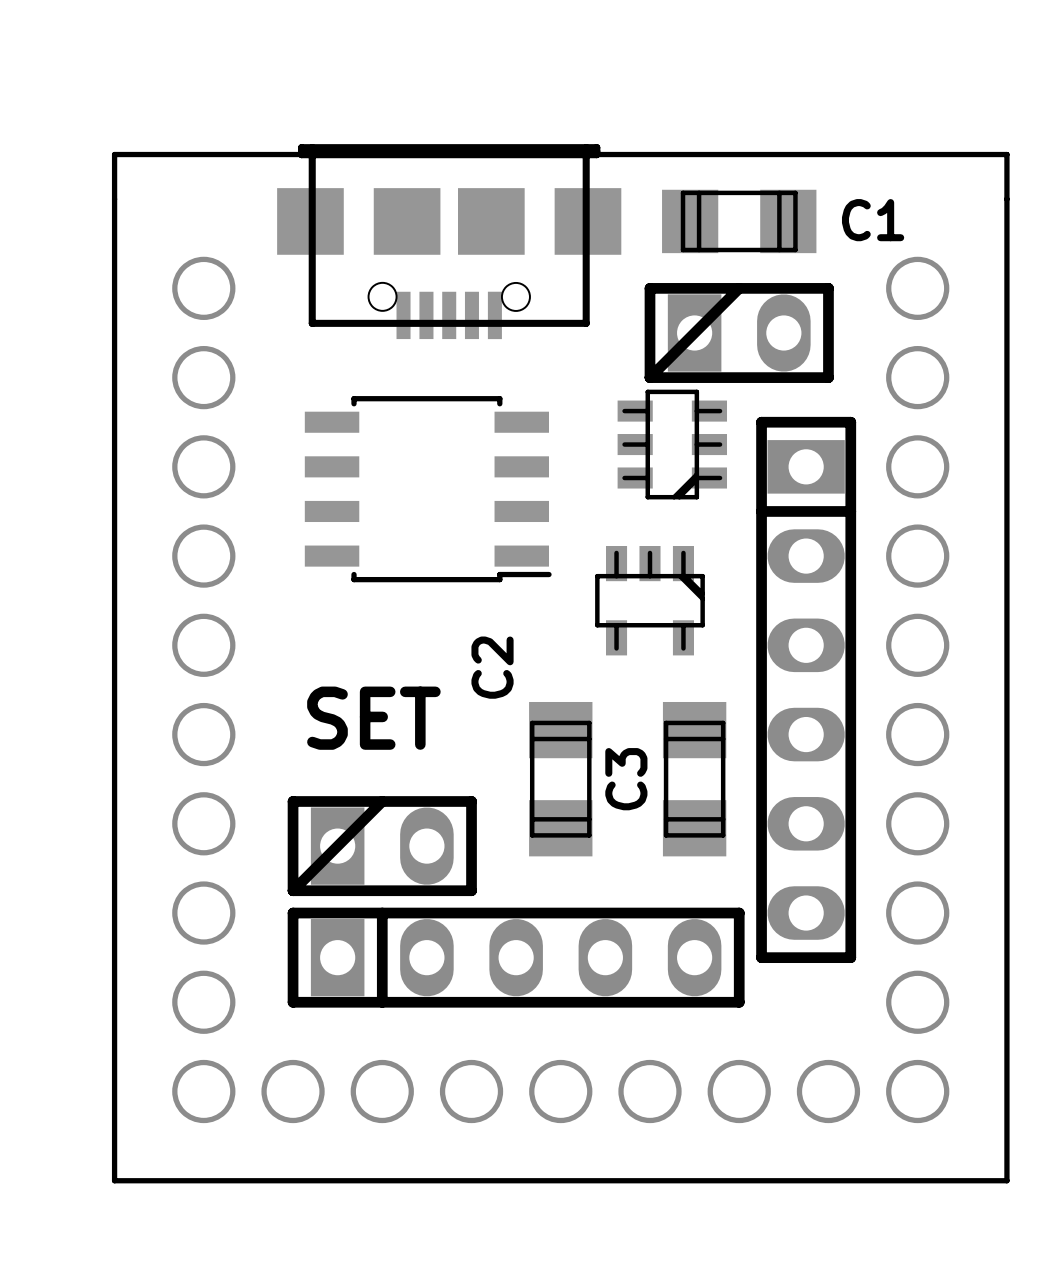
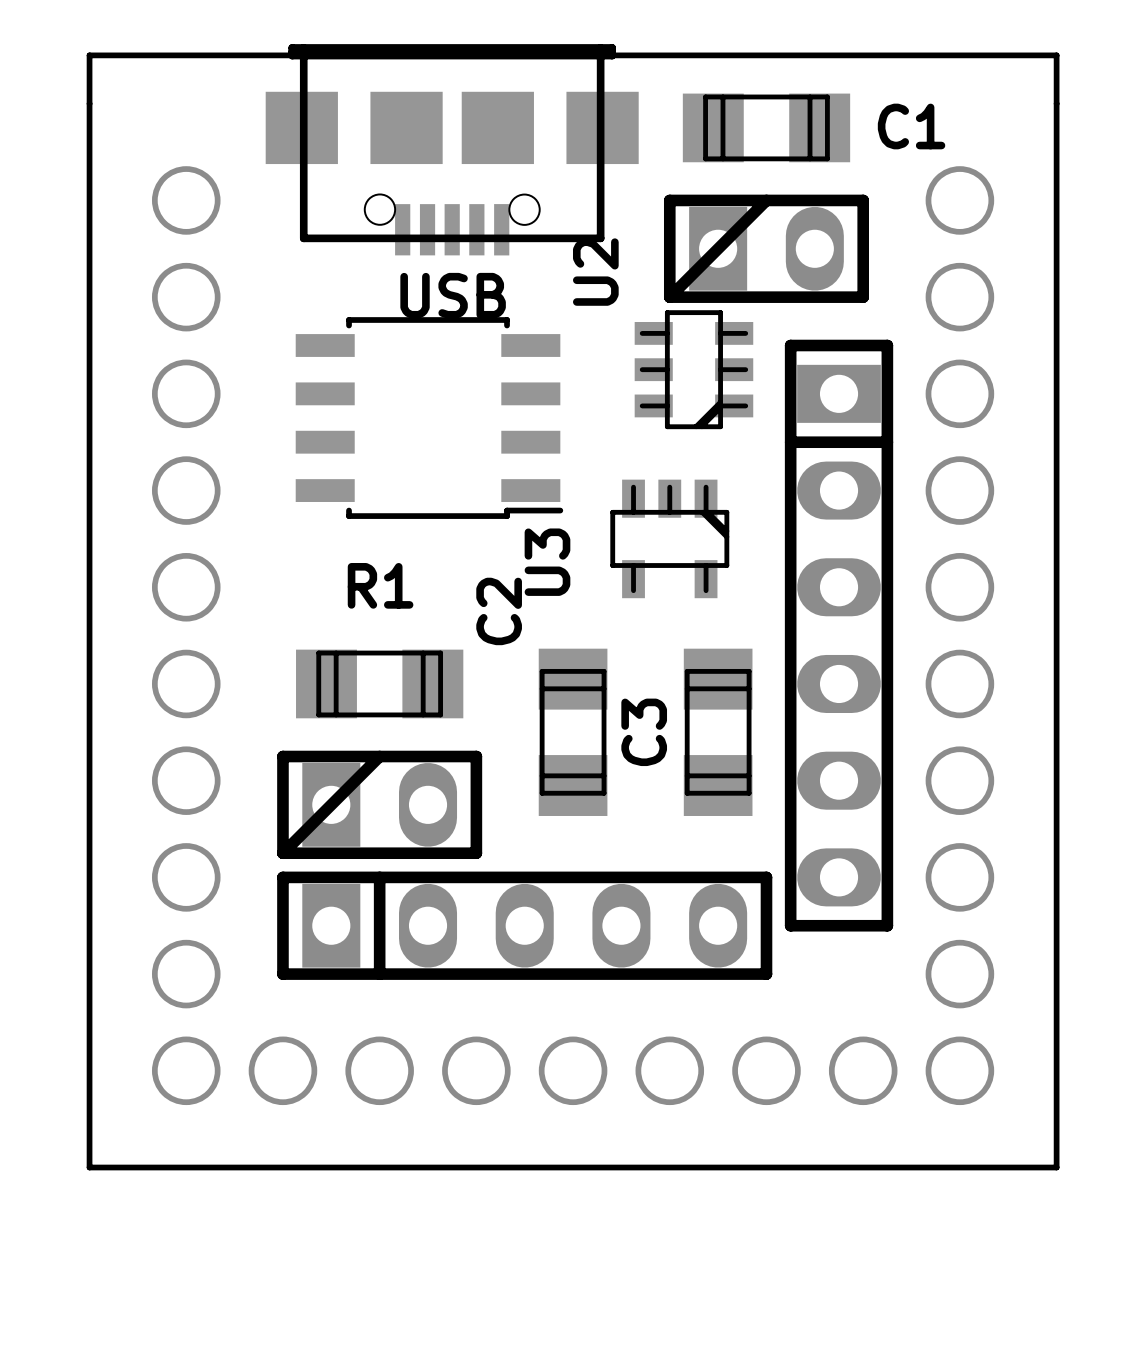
U2 name: none -> U2 (595, 272)
part value: none -> USB (453, 295)
U3 name: none -> U3 (547, 562)
text: SET (373, 718) -> none
R1: none -> (379, 683)

